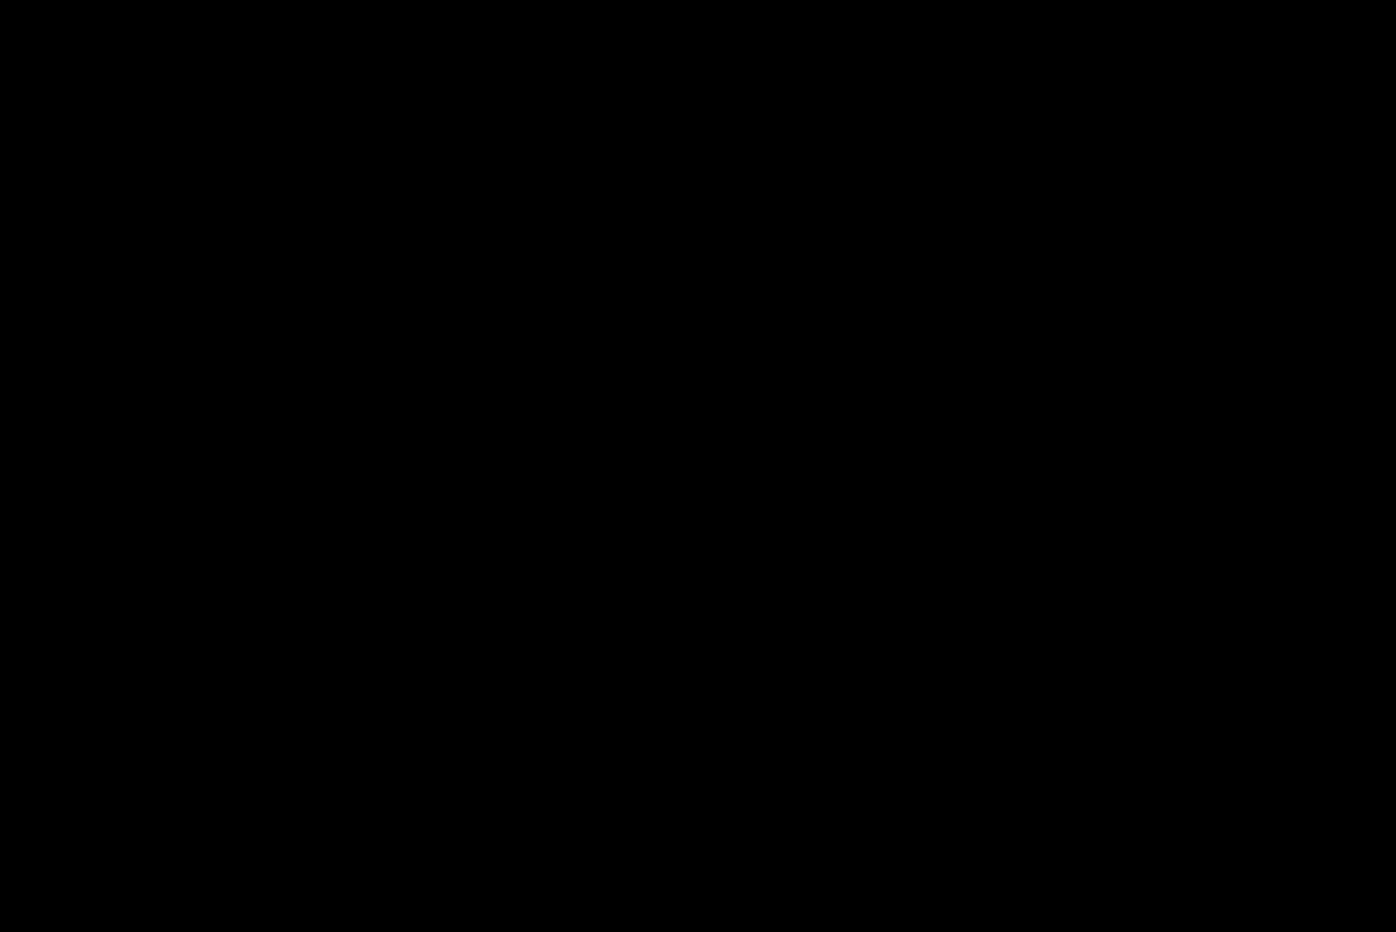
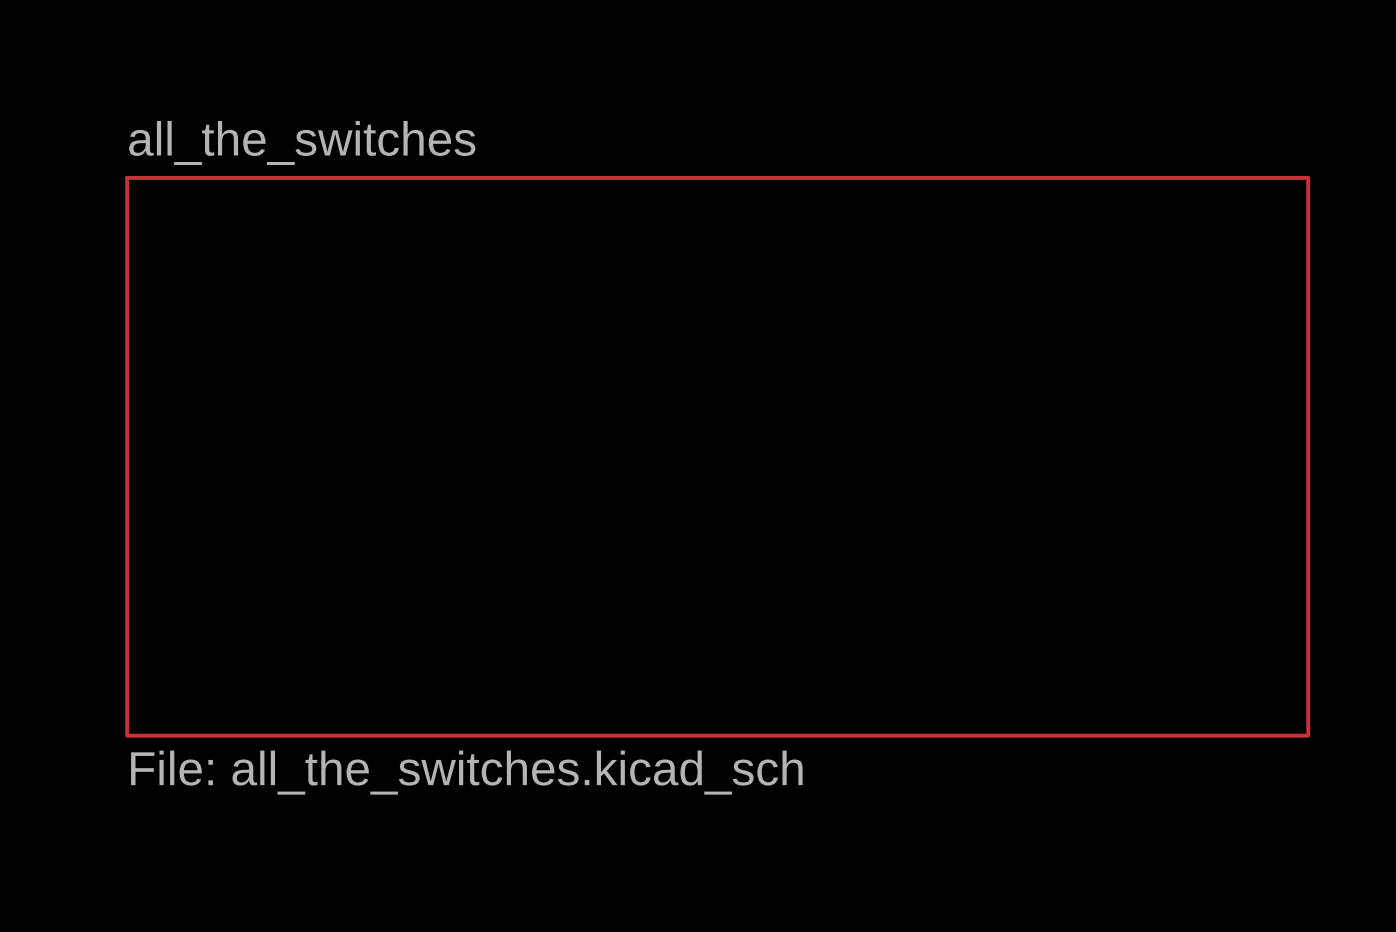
sheet all_the_switches: none -> File: all_the_switches.kicad_sch (717, 456)

